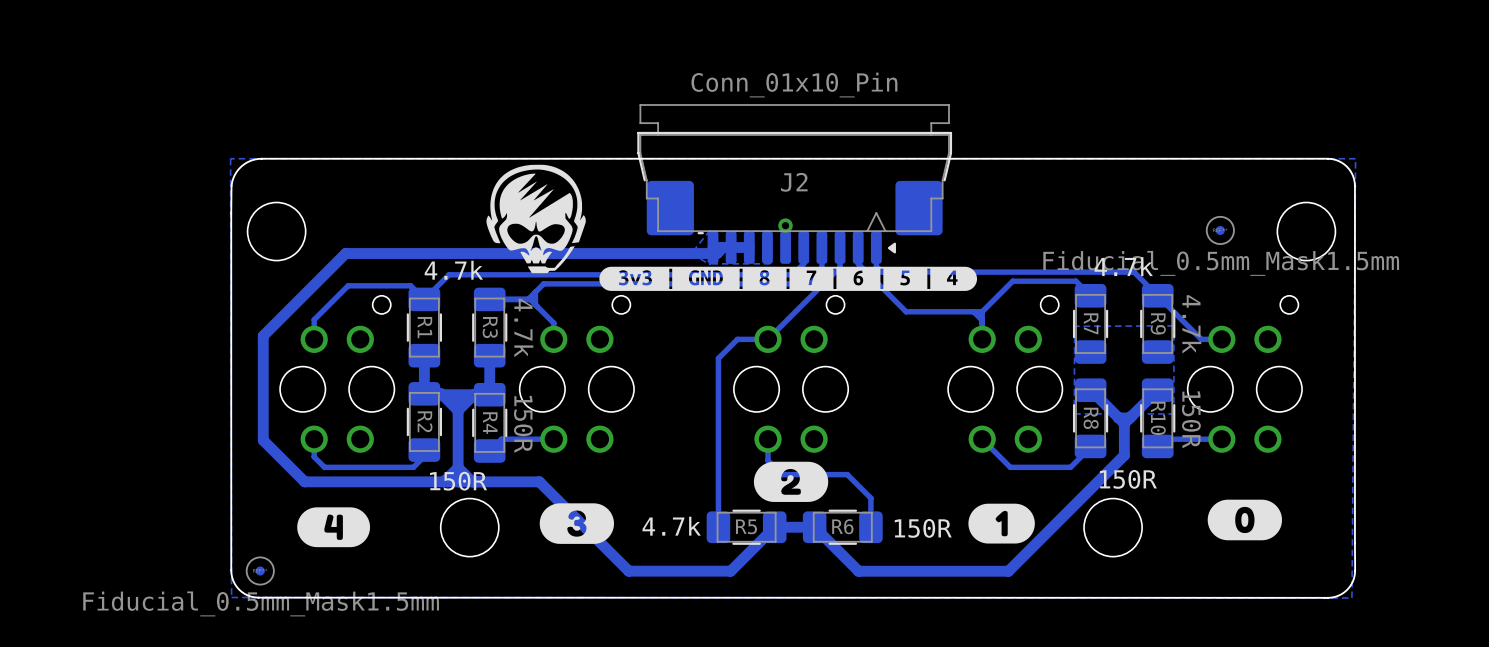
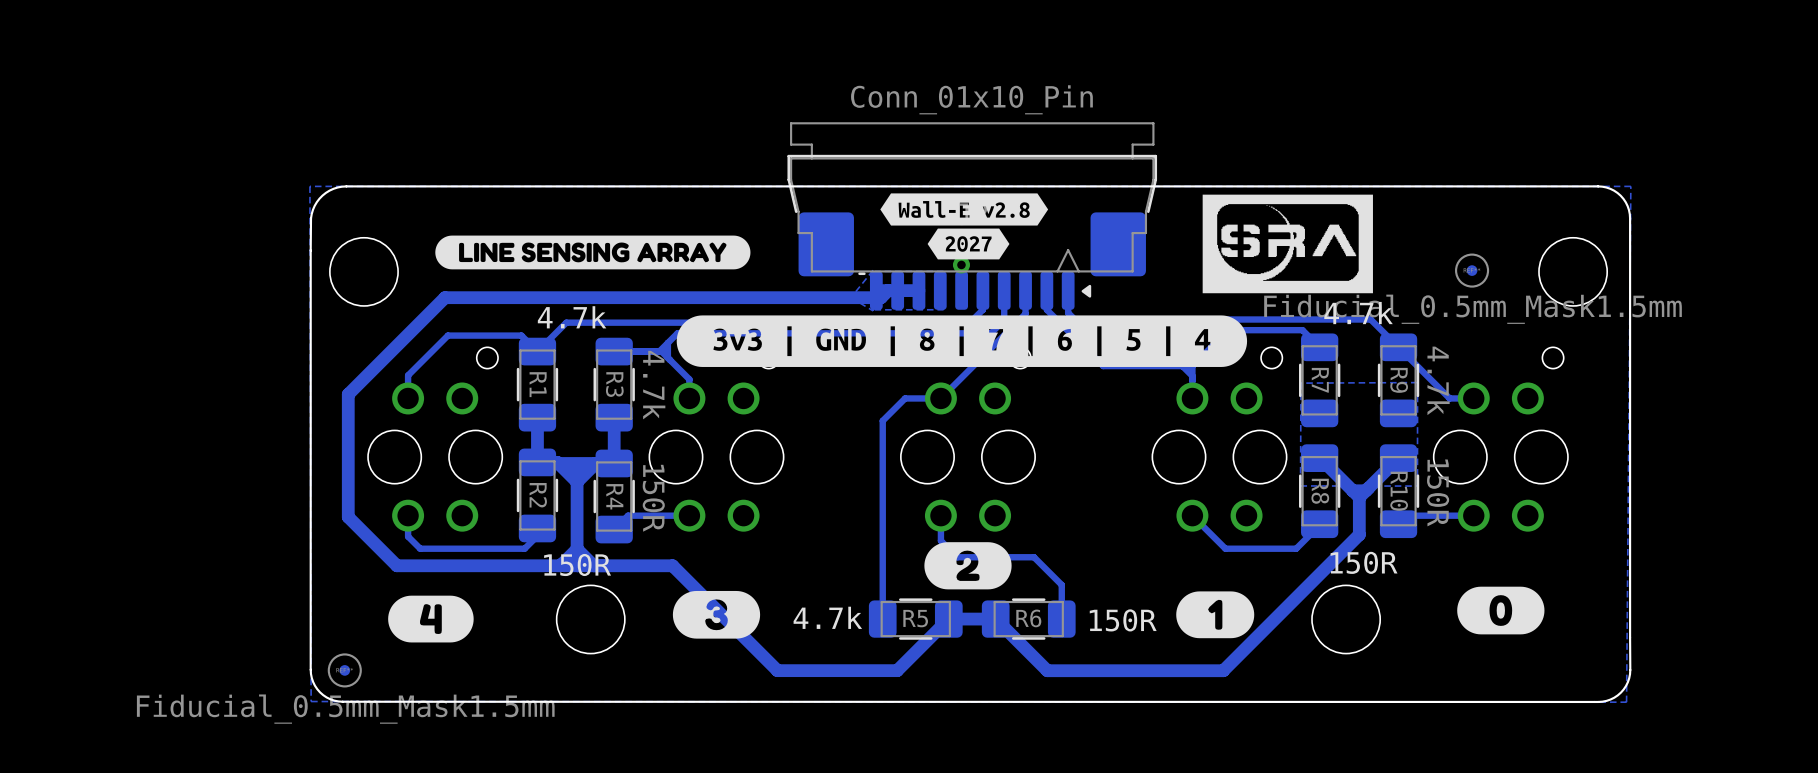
drawing: [486, 164, 586, 274] -> none
drawing: none -> [880, 193, 1049, 260]
drawing: none -> [1202, 194, 1373, 294]
drawing: none -> [435, 235, 751, 270]
drawing shape: [599, 266, 978, 291] -> [676, 315, 1248, 367]

